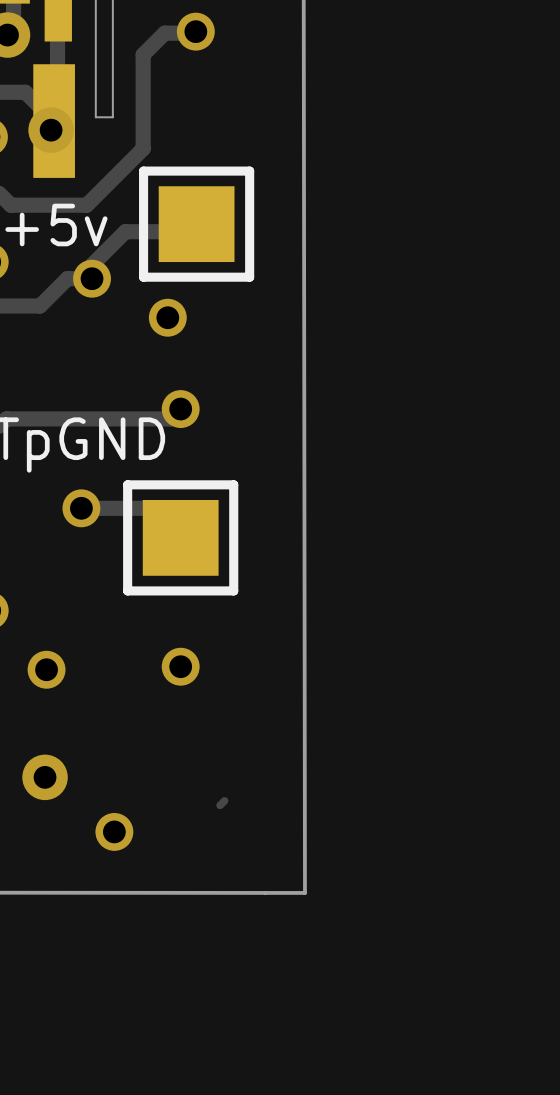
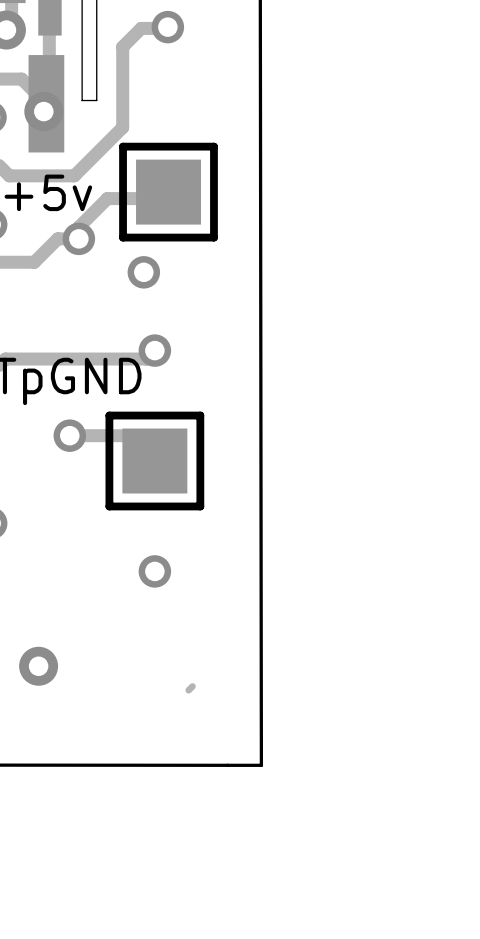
via: (46, 669) -> none
via: (114, 831) -> none

